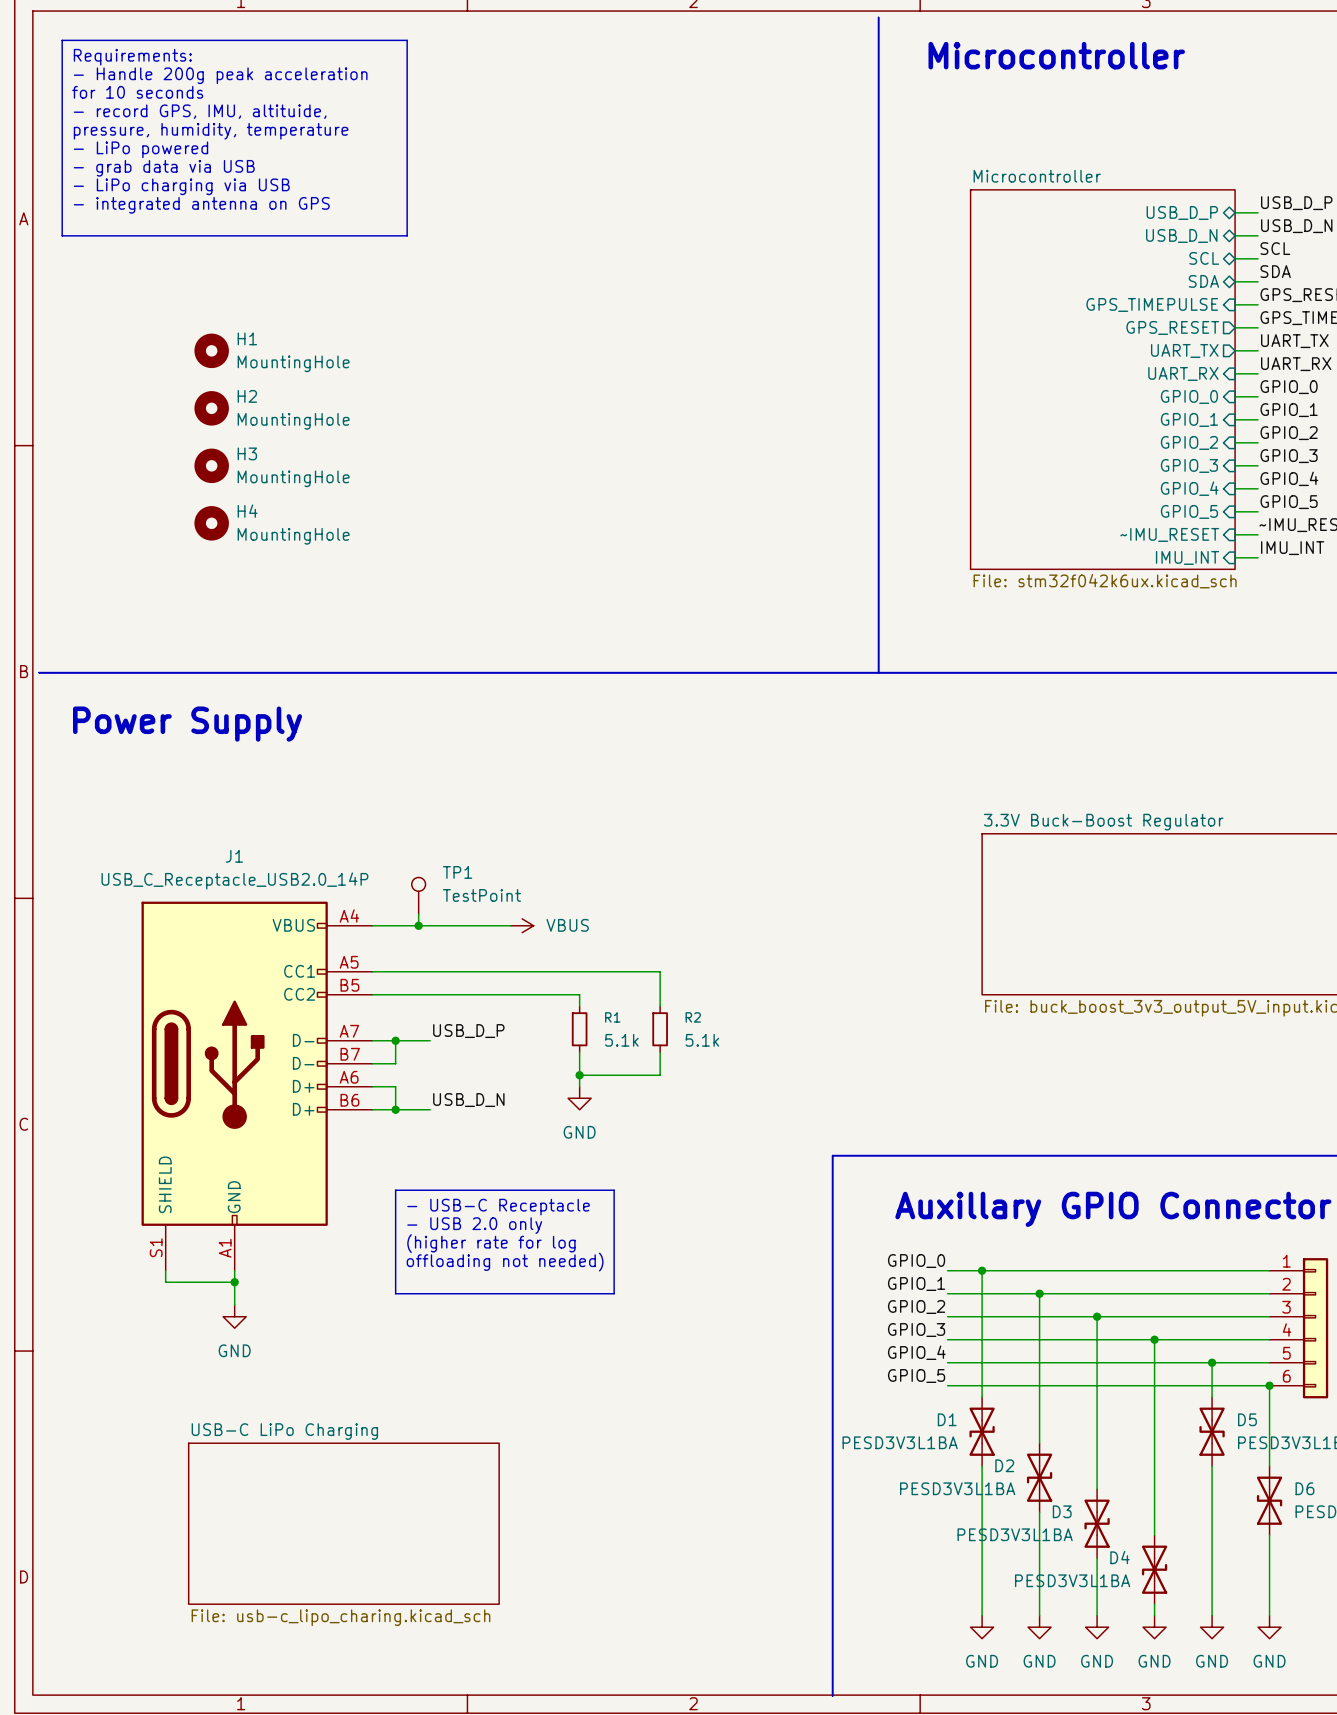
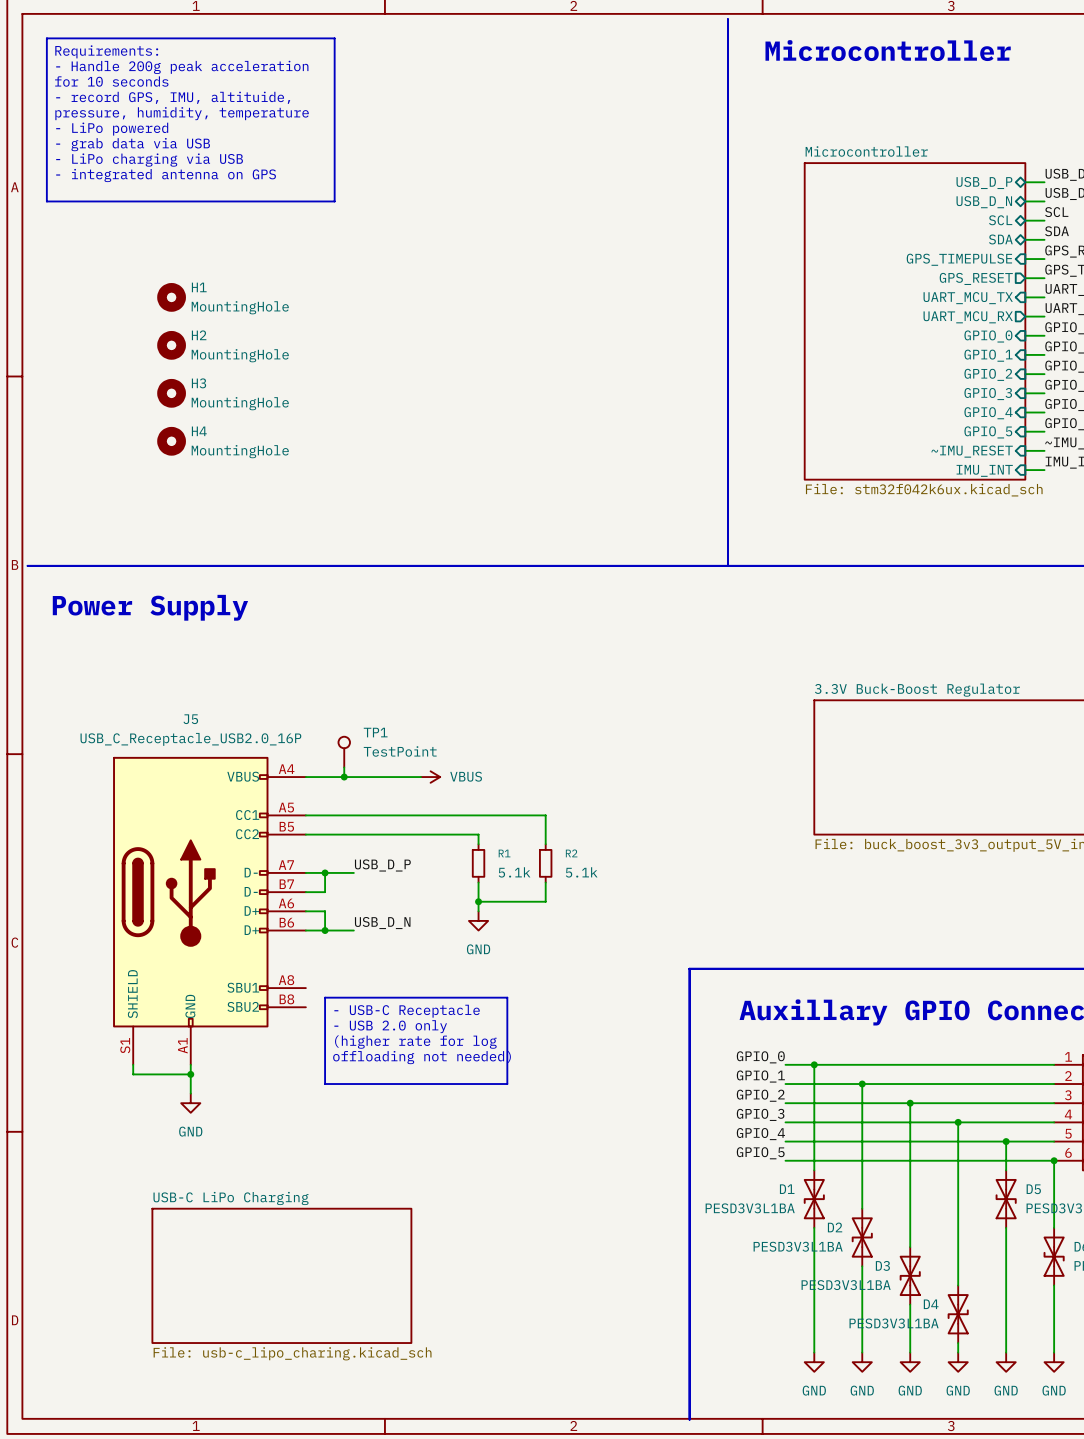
sheet pin shape: output (1184, 350) -> input (968, 298)
sheet pin: UART_TX (1184, 350) -> UART_MCU_TX (968, 298)
sheet pin shape: input (1183, 373) -> output (968, 317)
sheet pin: UART_RX (1183, 373) -> UART_MCU_RX (968, 317)
J1: USB_C_Receptacle_USB2.0_14P (257, 1086) -> none
J5: none -> USB_C_Receptacle_USB2.0_16P (209, 910)

